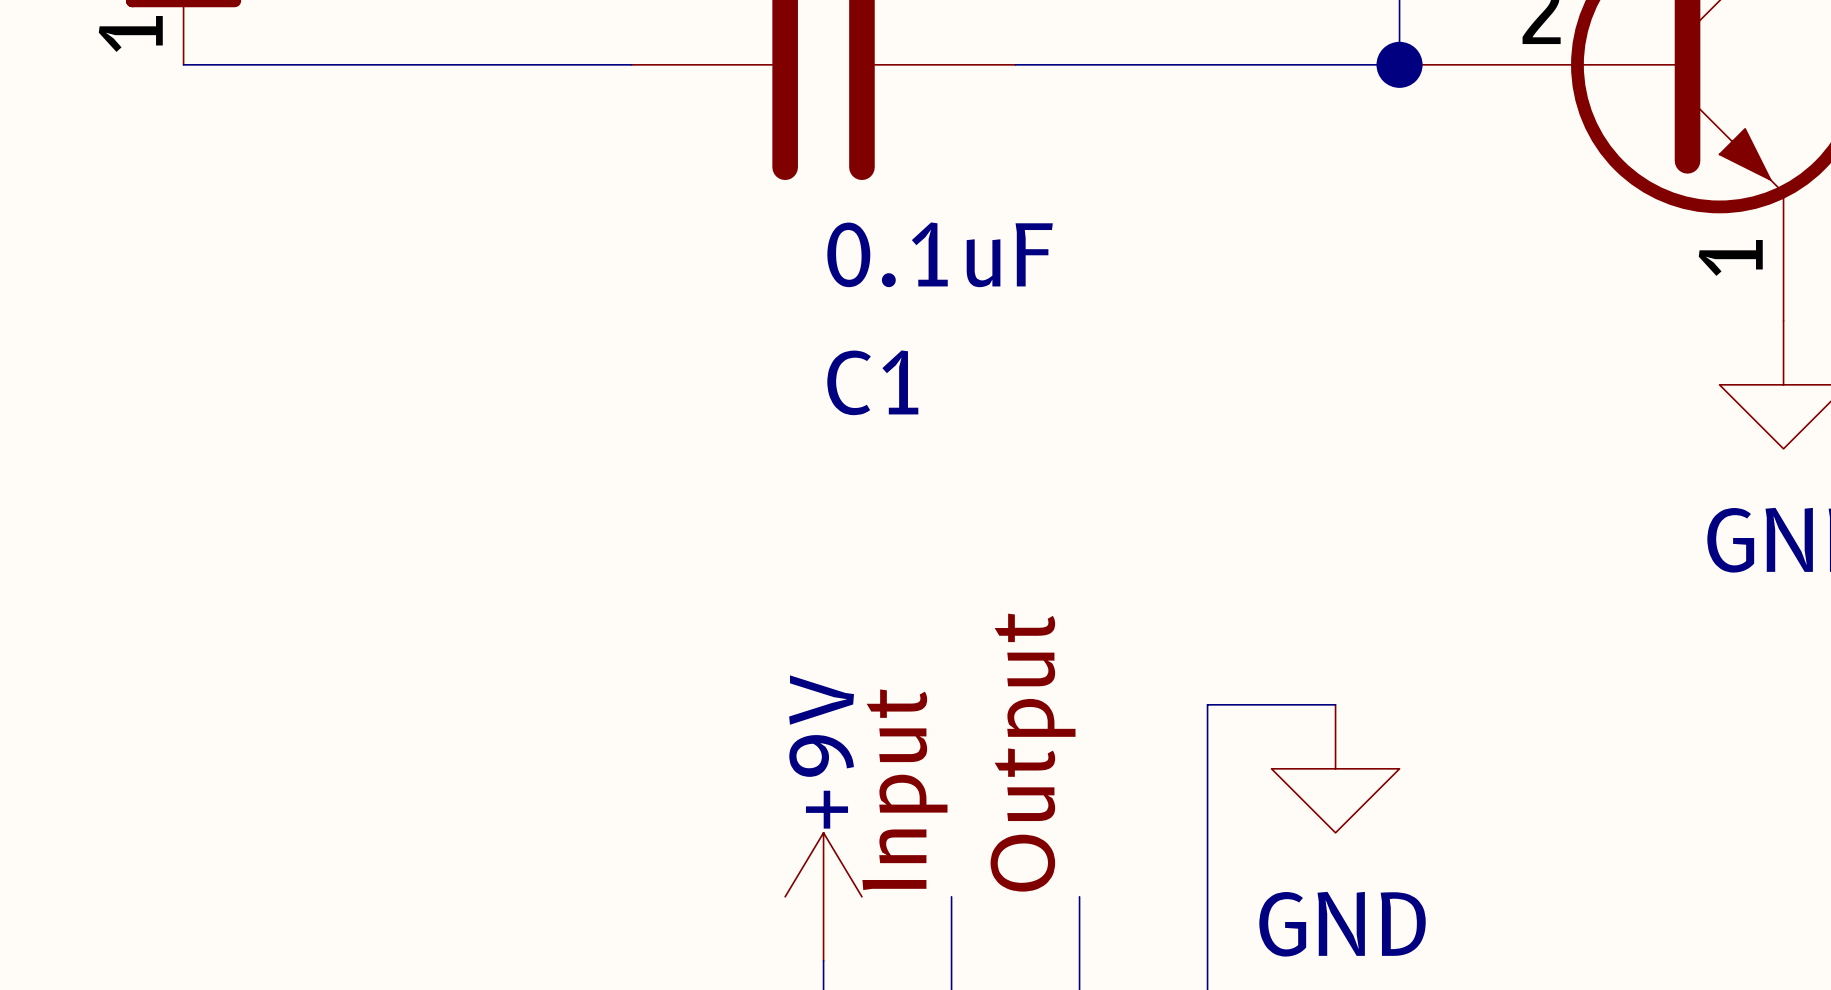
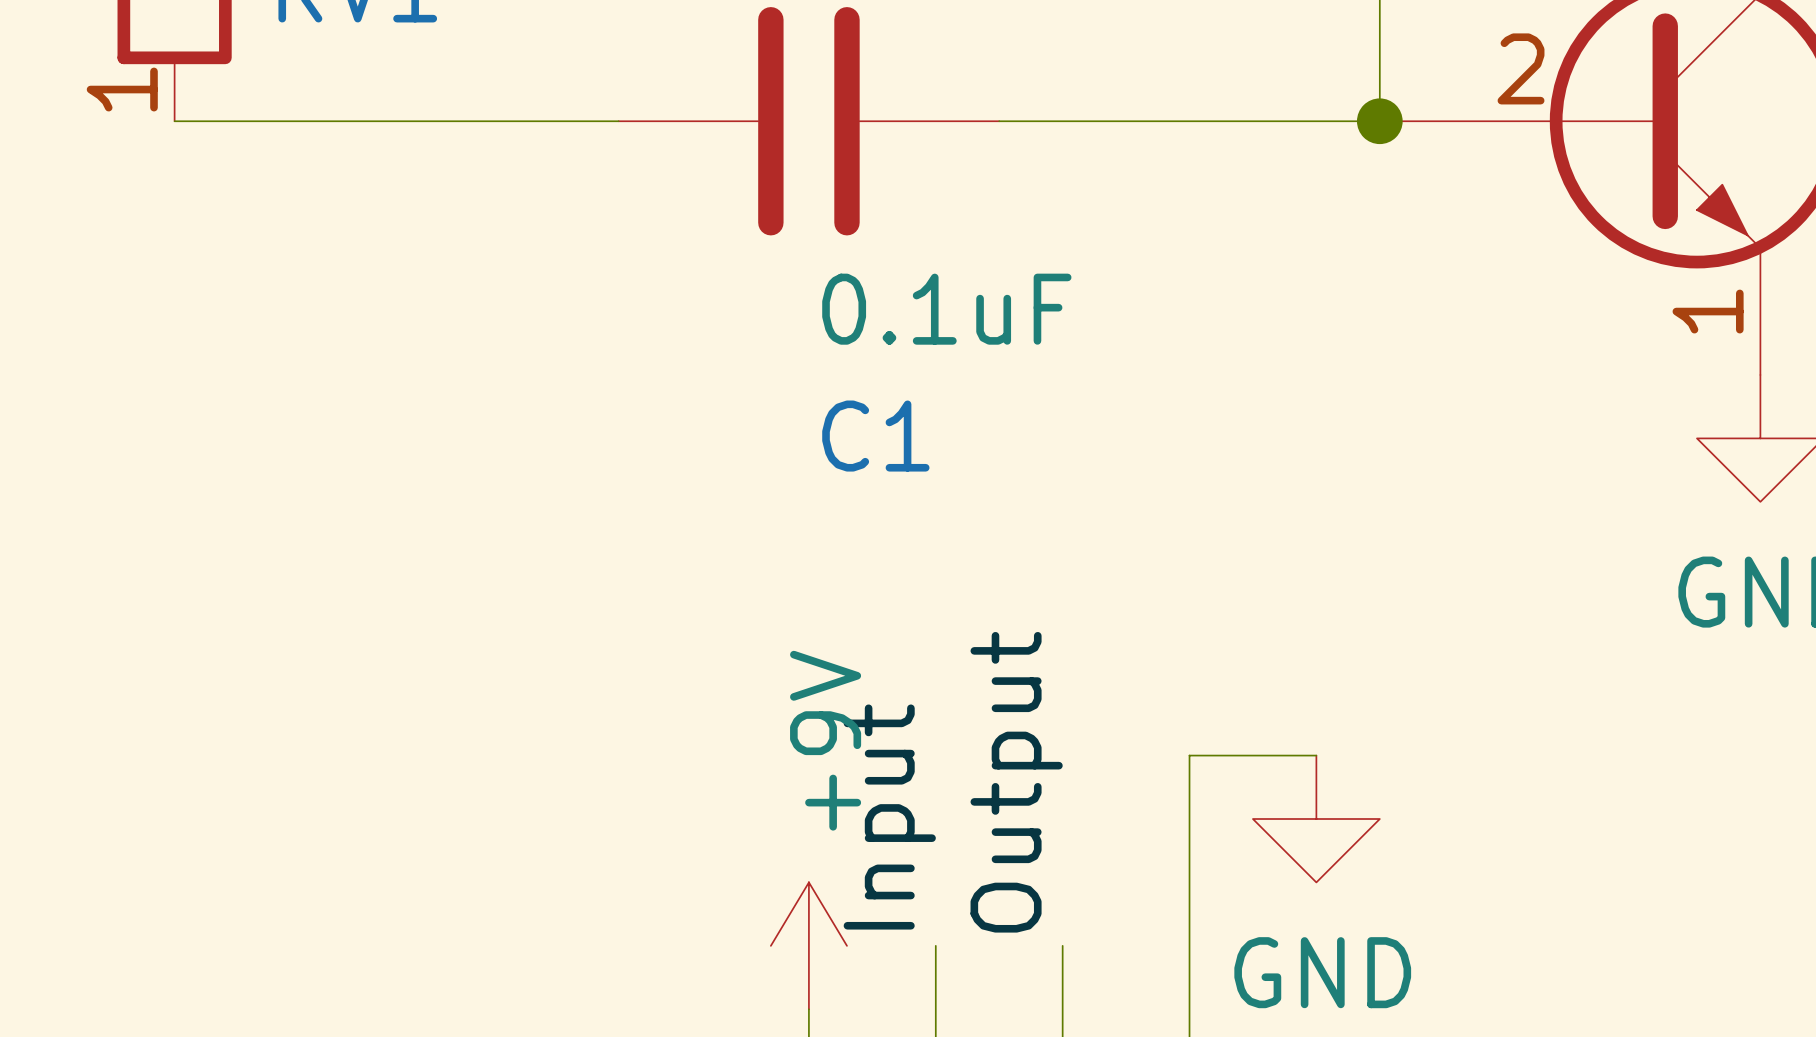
power symbol text position: +9V (821, 751) -> +9V (825, 740)

